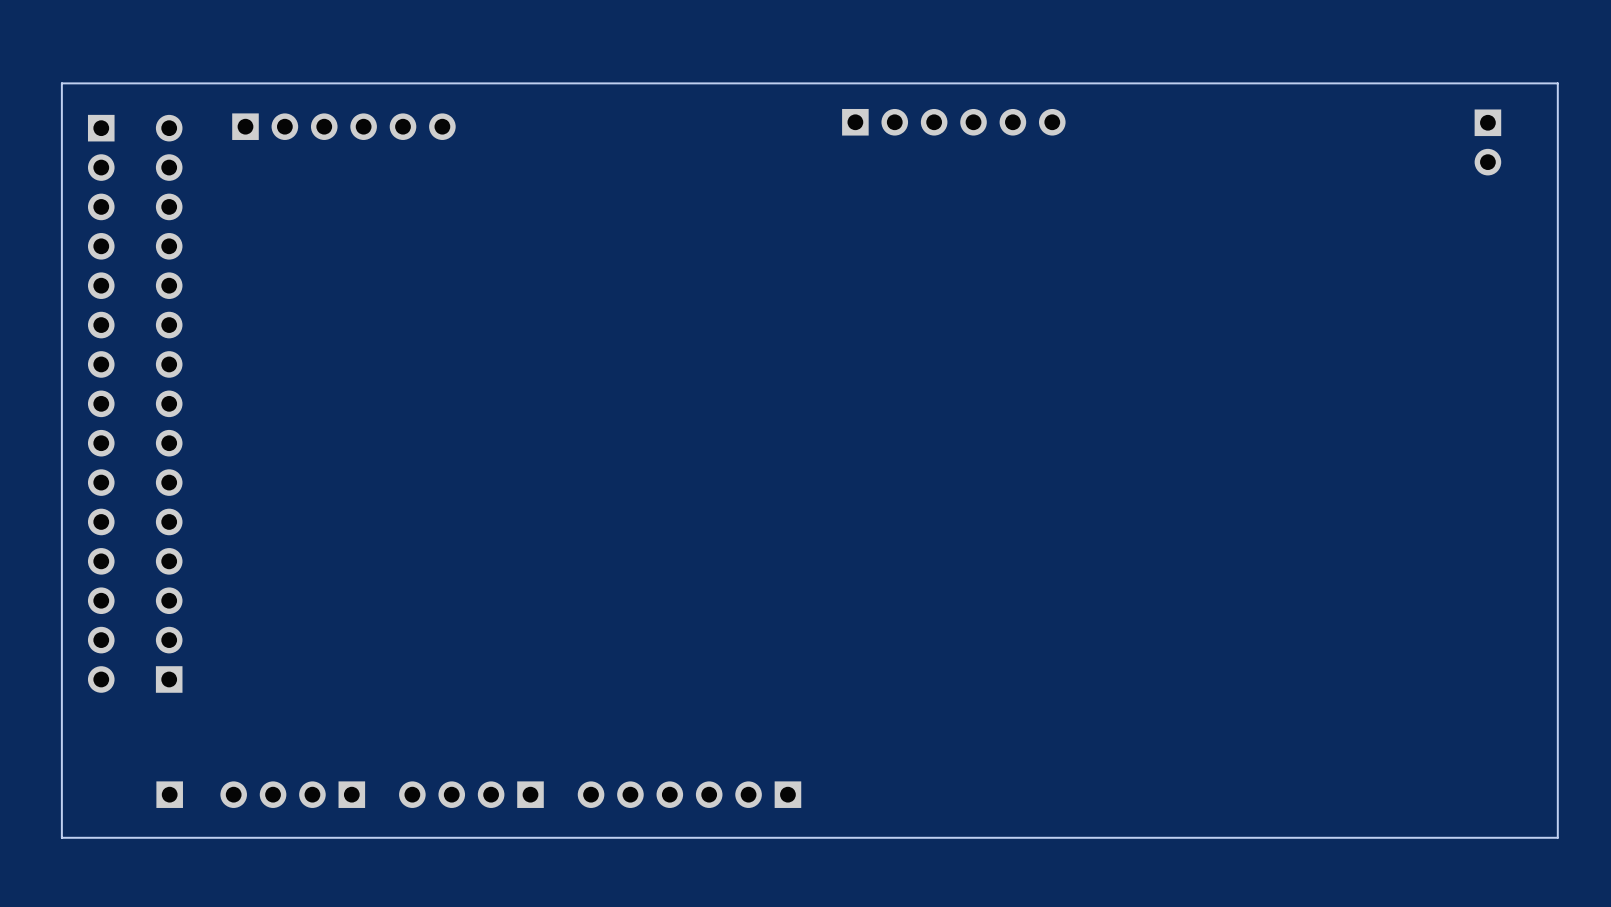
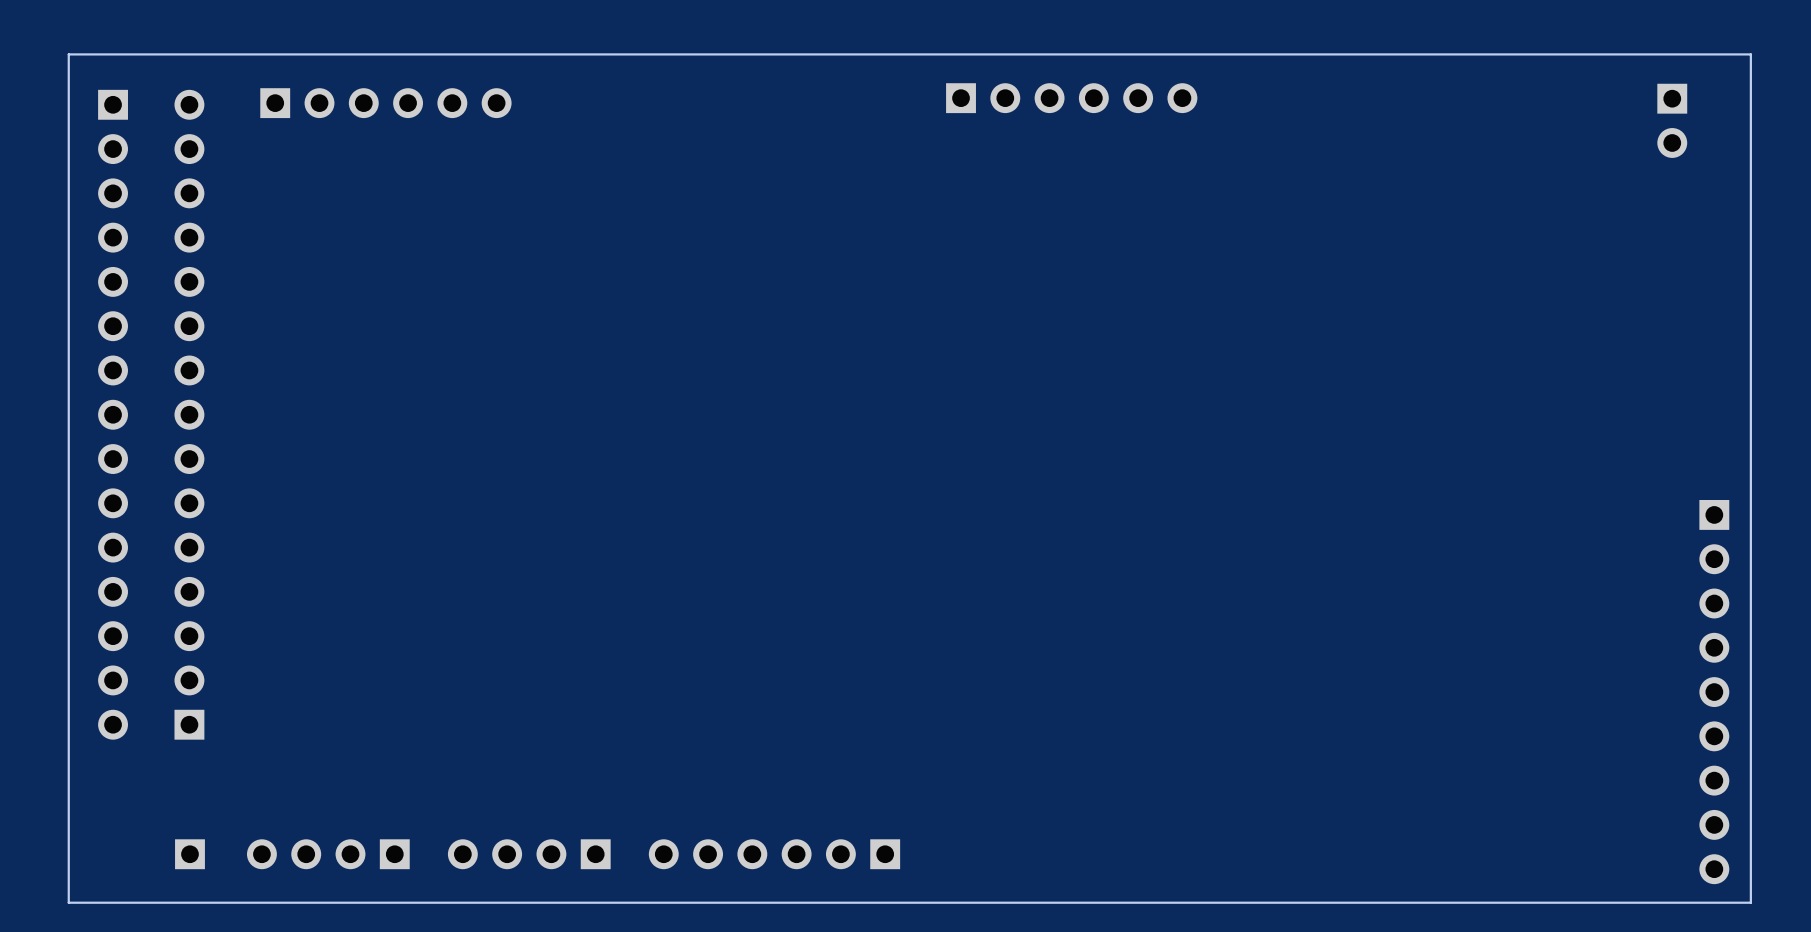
part: none -> (1714, 692)

